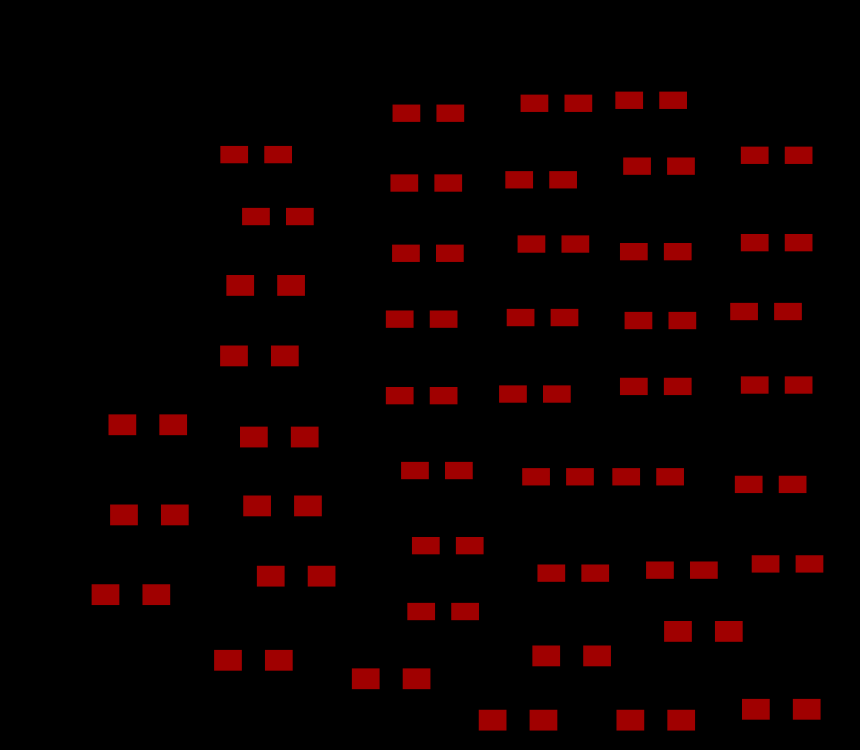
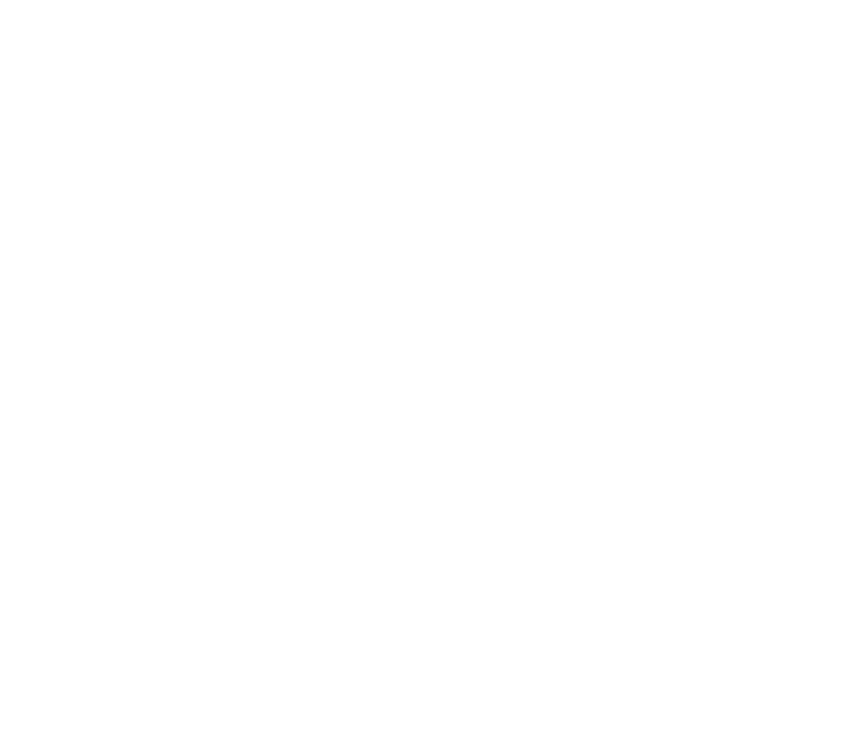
part: (651, 100) -> none
part: (556, 103) -> none
part: (428, 113) -> none
part: (256, 154) -> none
part: (776, 155) -> none
part: (659, 166) -> none
part: (541, 179) -> none
part: (426, 183) -> none
part: (277, 216) -> none
part: (776, 242) -> none
part: (553, 244) -> none
part: (655, 251) -> none
part: (427, 253) -> none
part: (265, 285) -> none
part: (766, 311) -> none
part: (542, 317) -> none
part: (421, 319) -> none
part: (660, 320) -> none
part: (259, 355) -> none
part: (776, 385) -> none
part: (655, 386) -> none
part: (534, 394) -> none
part: (421, 395) -> none
part: (147, 424) -> none
part: (279, 437) -> none
part: (436, 470) -> none
part: (558, 476) -> none
part: (648, 476) -> none
part: (770, 484) -> none
part: (282, 505) -> none
part: (149, 514) -> none
part: (447, 545) -> none
part: (787, 563) -> none
part: (681, 570) -> none
part: (573, 573) -> none
part: (296, 576) -> none
part: (130, 594) -> none
part: (443, 611) -> none
part: (703, 631) -> none
part: (571, 655) -> none
part: (253, 660) -> none
part: (391, 678) -> none
part: (781, 709) -> none
part: (518, 720) -> none
part: (655, 720) -> none

